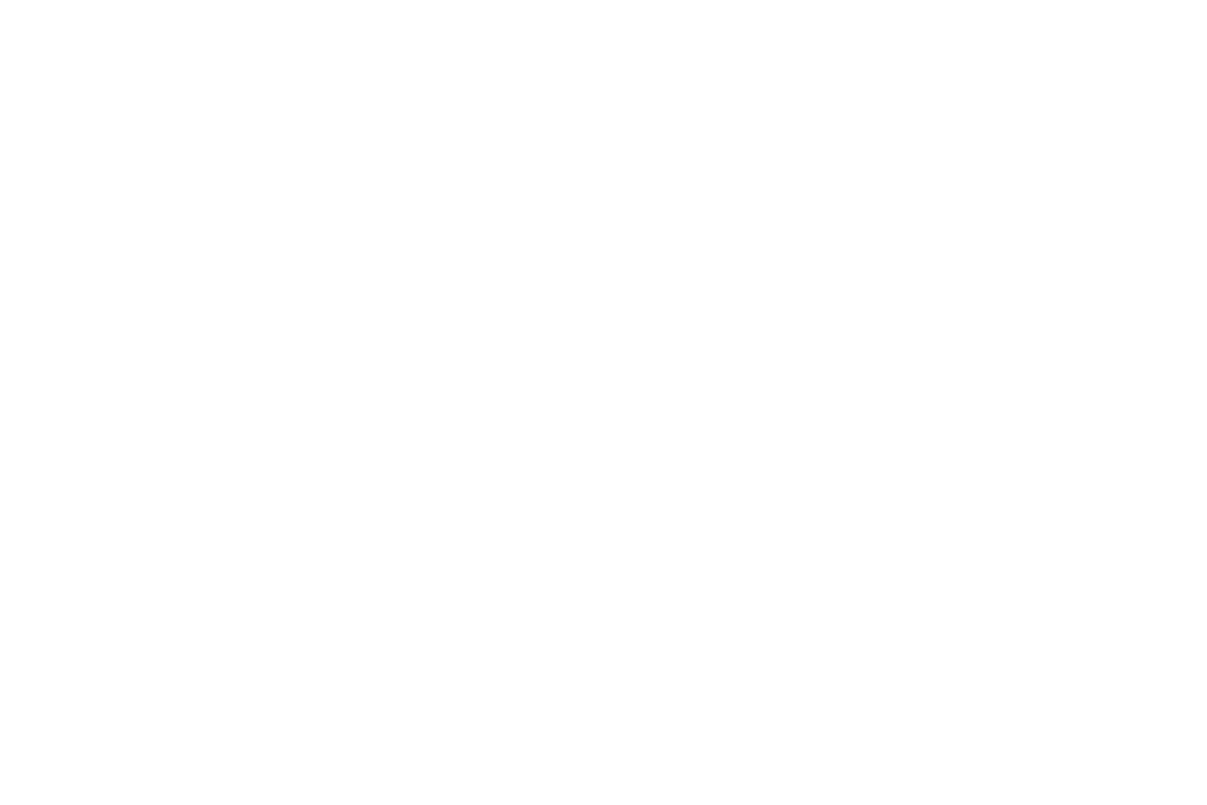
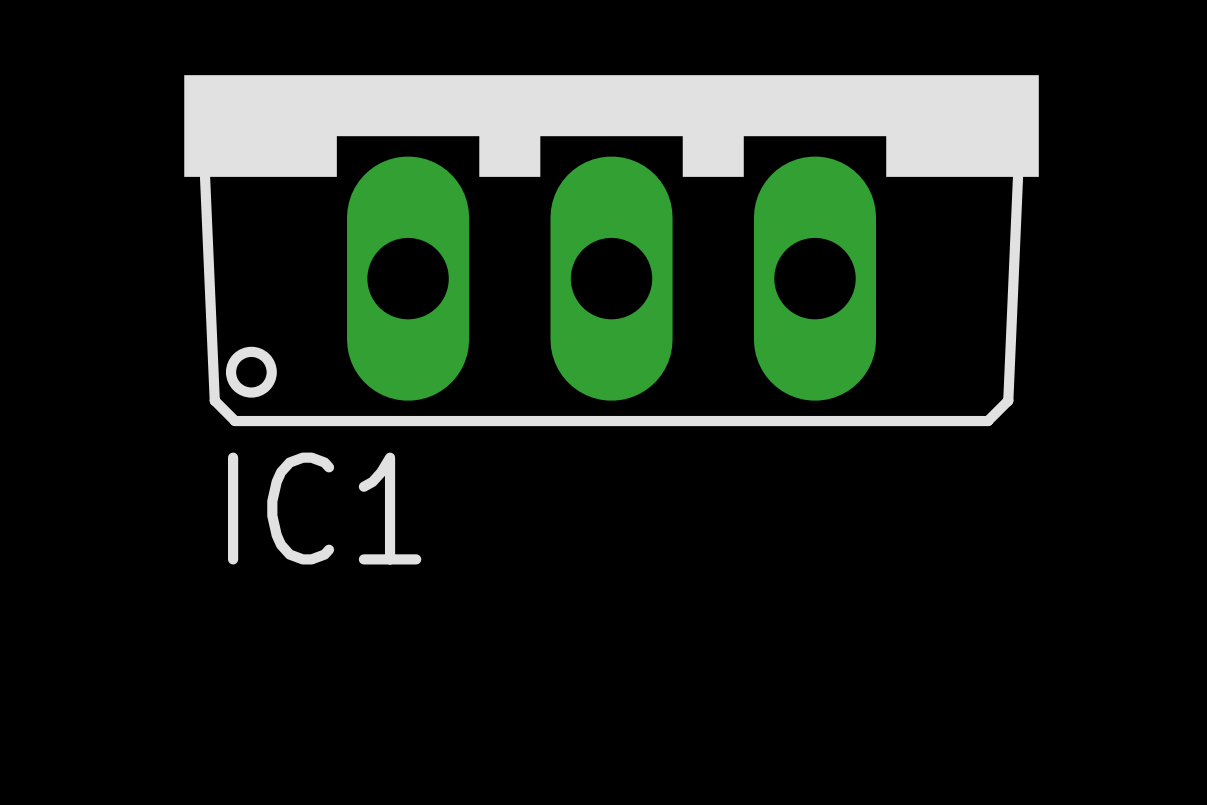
IC1: none -> (611, 250)

